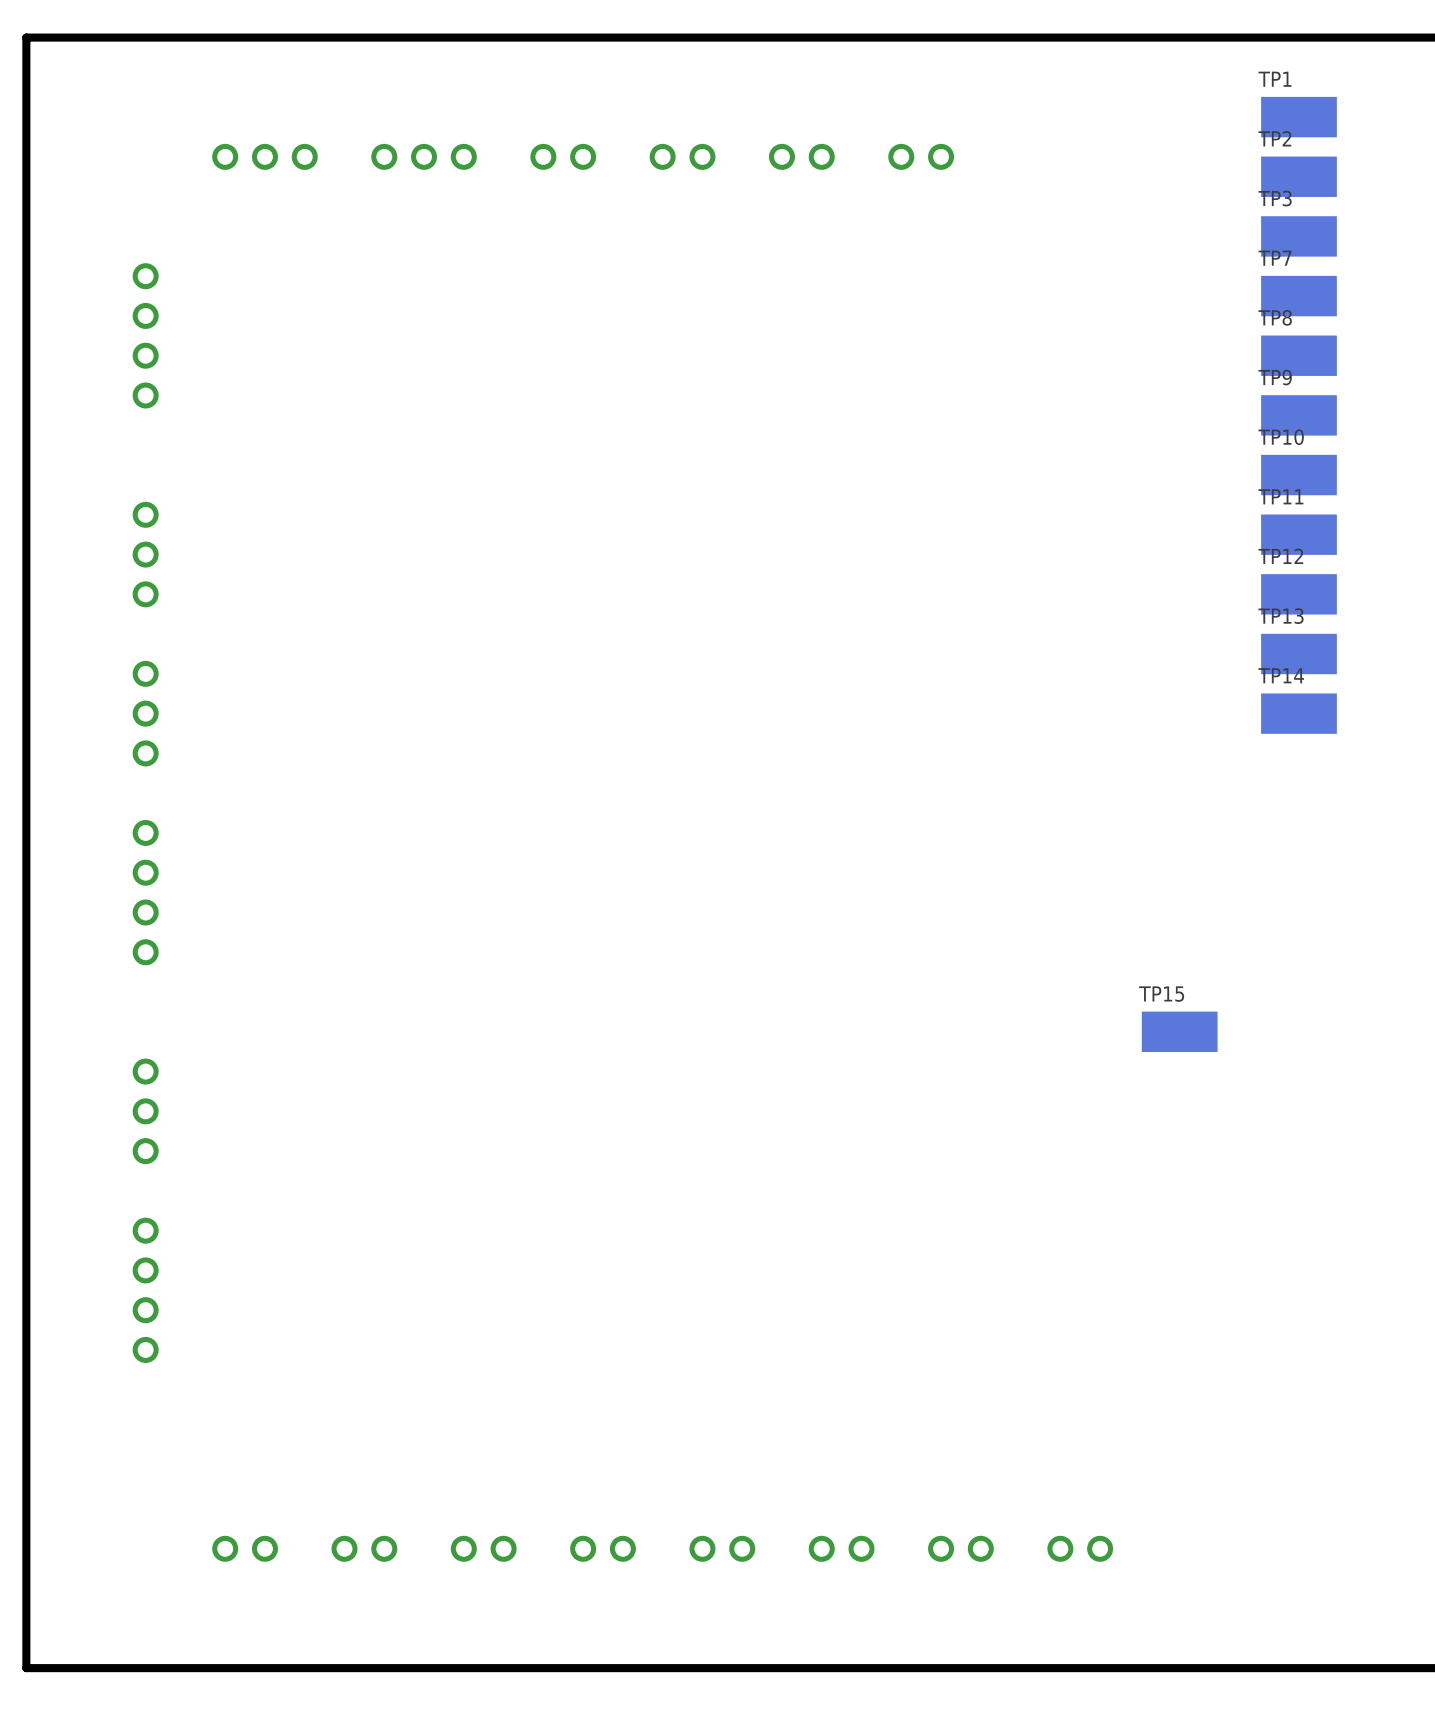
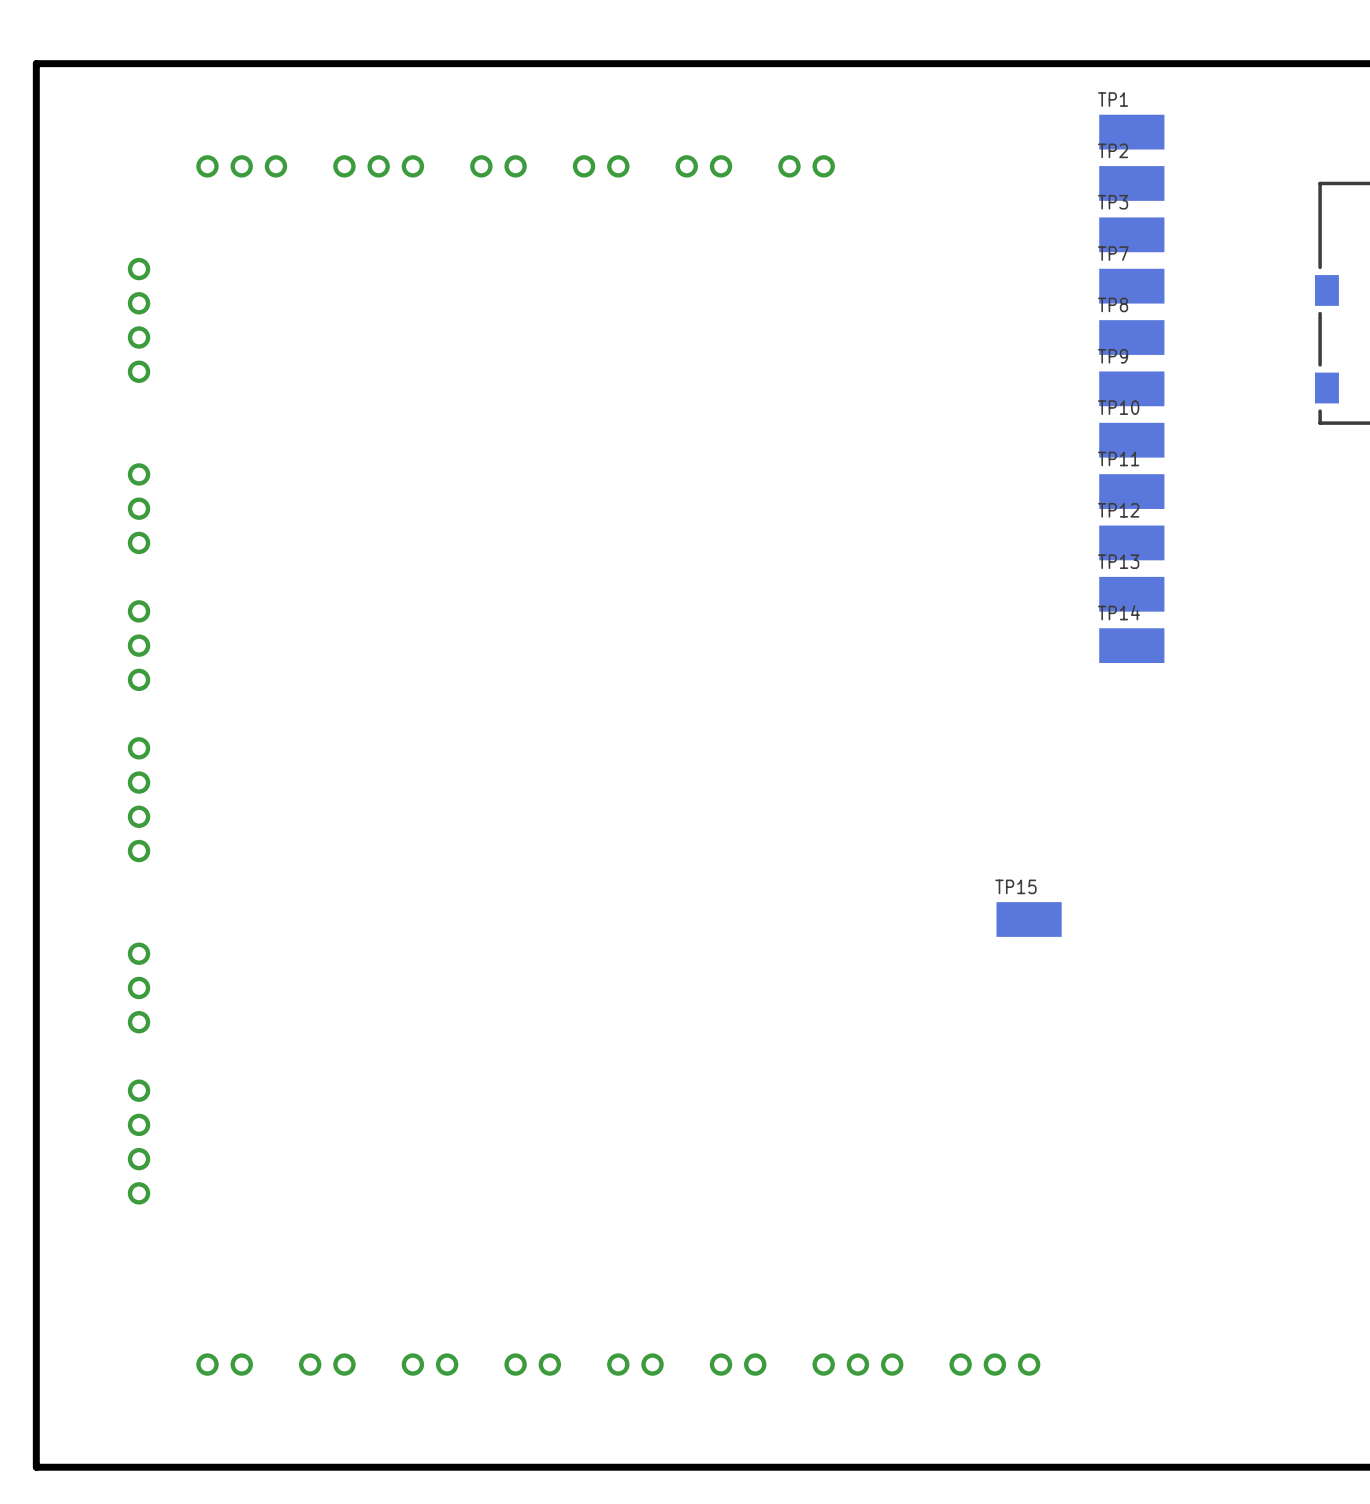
part footprint: [928, 1535, 994, 1562] -> [812, 1353, 904, 1376]
part: (1080, 1548) -> none
part: none -> (994, 1364)

